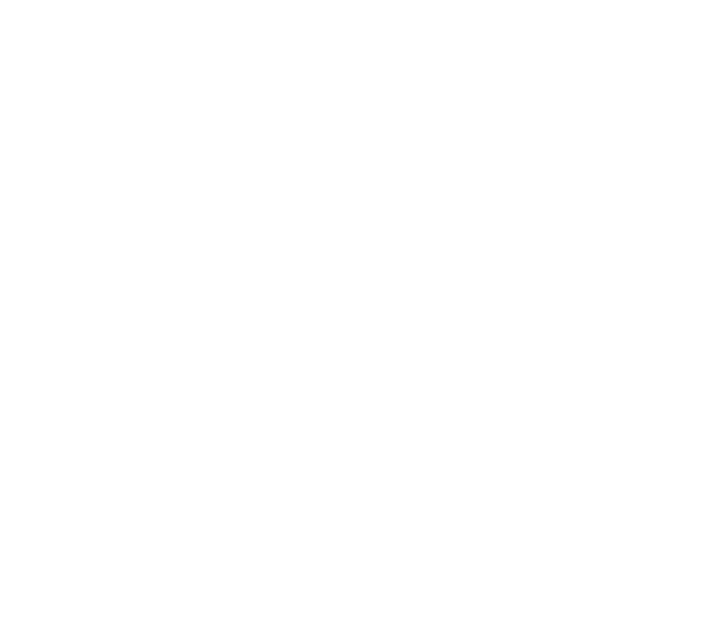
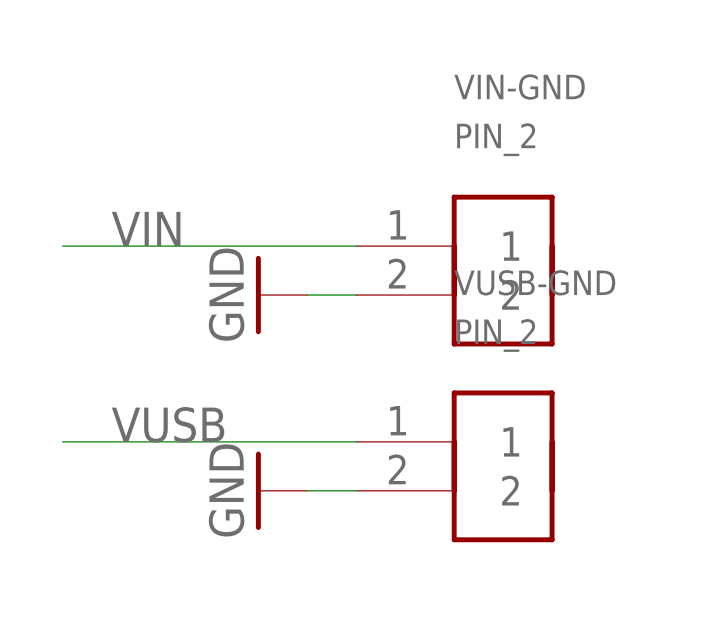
label: none -> VIN (146, 228)
wire: none -> (62, 246) (356, 246)
VIN-GND: none -> PIN_2 (455, 270)
power symbol: none -> GND (281, 295)
wire: none -> (307, 295) (356, 295)
label: none -> VUSB (168, 424)
wire: none -> (62, 441) (356, 441)
VUSB-GND: none -> PIN_2 (455, 466)
power symbol: none -> GND (281, 490)
wire: none -> (307, 490) (356, 490)

